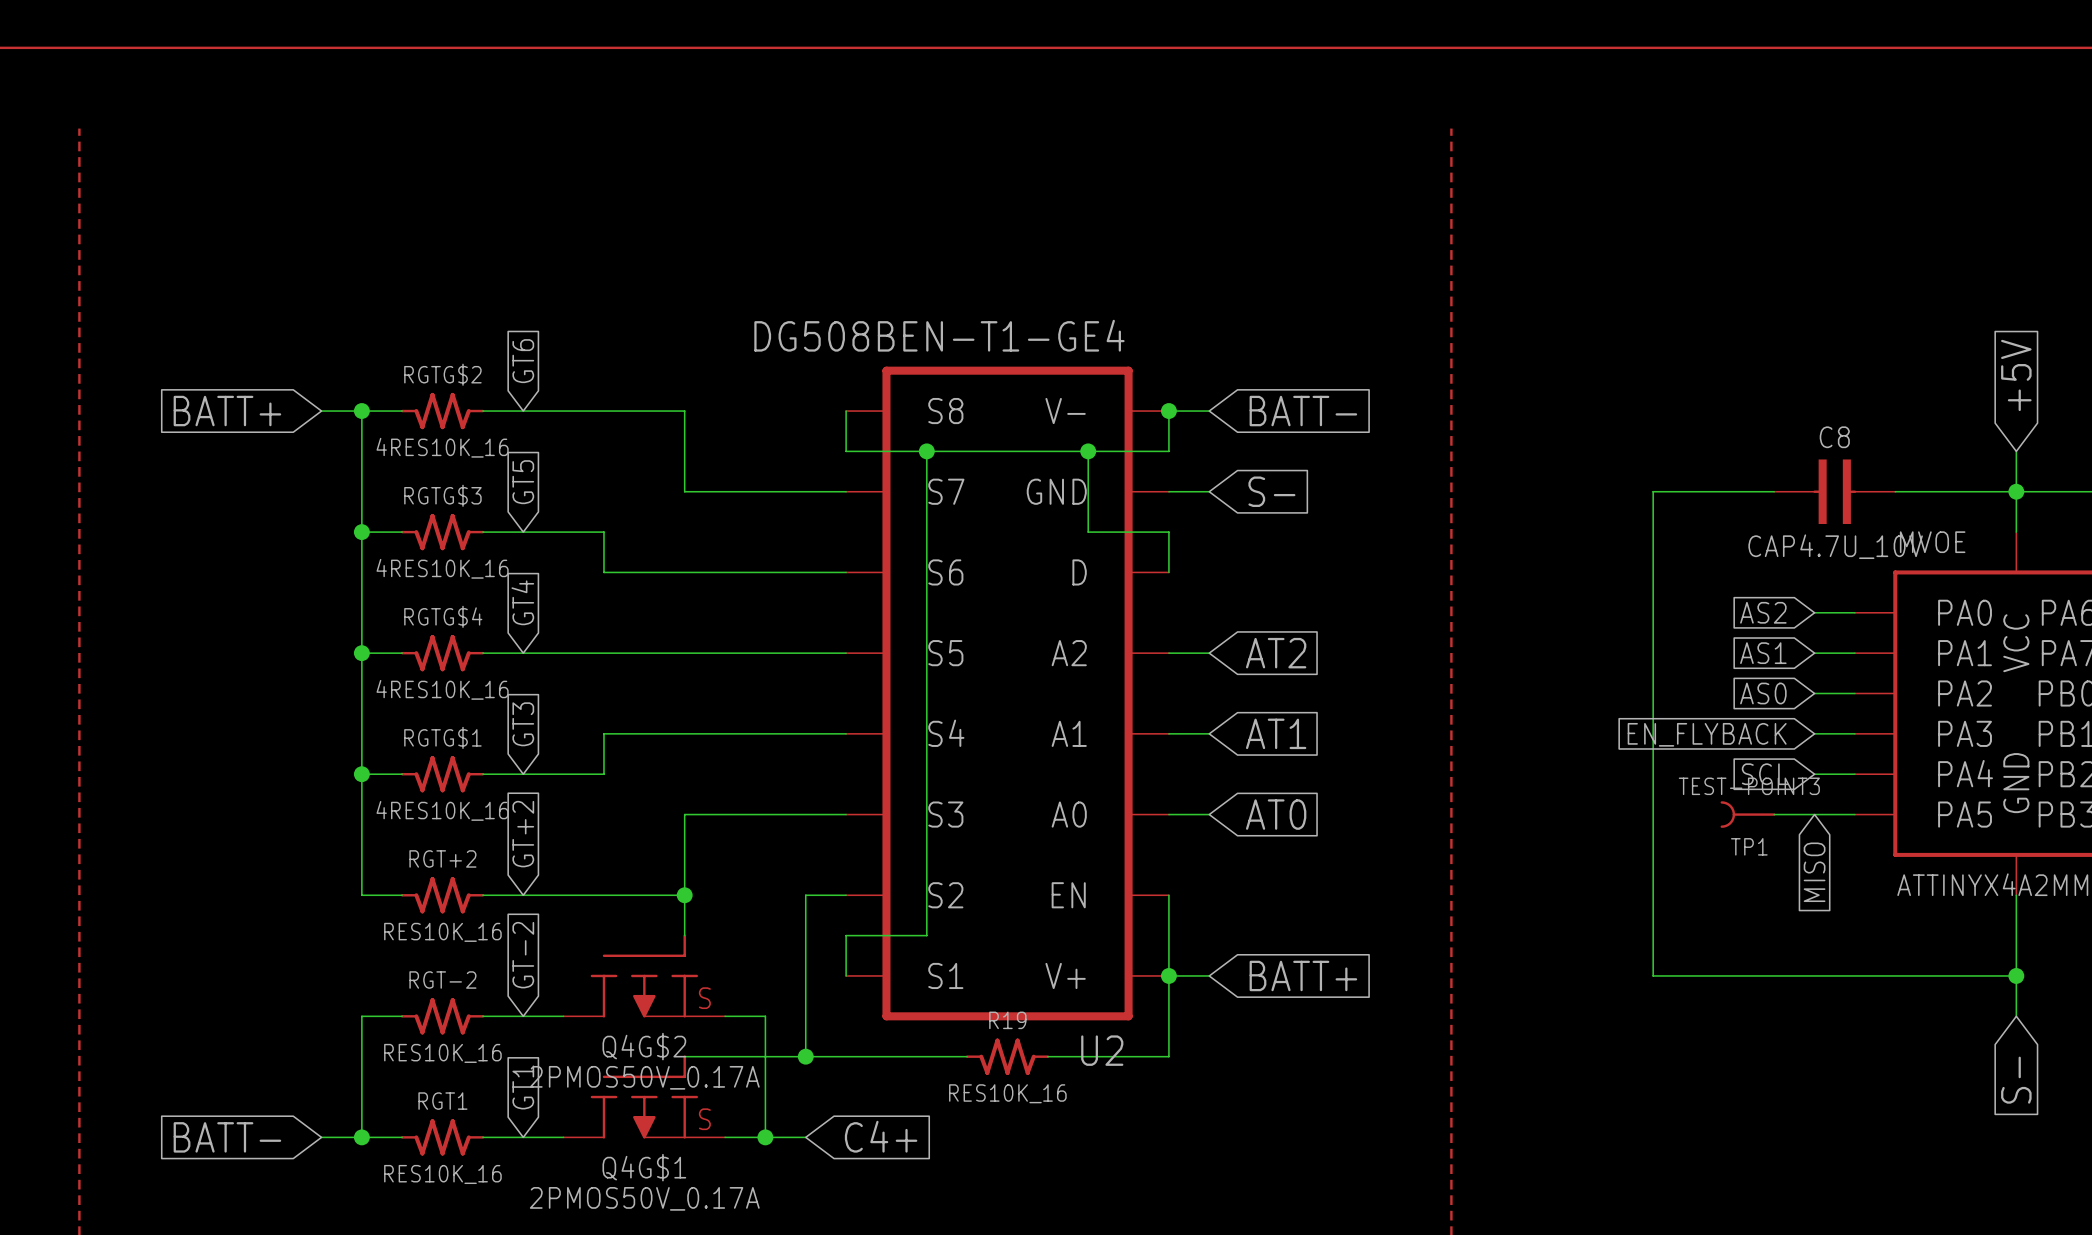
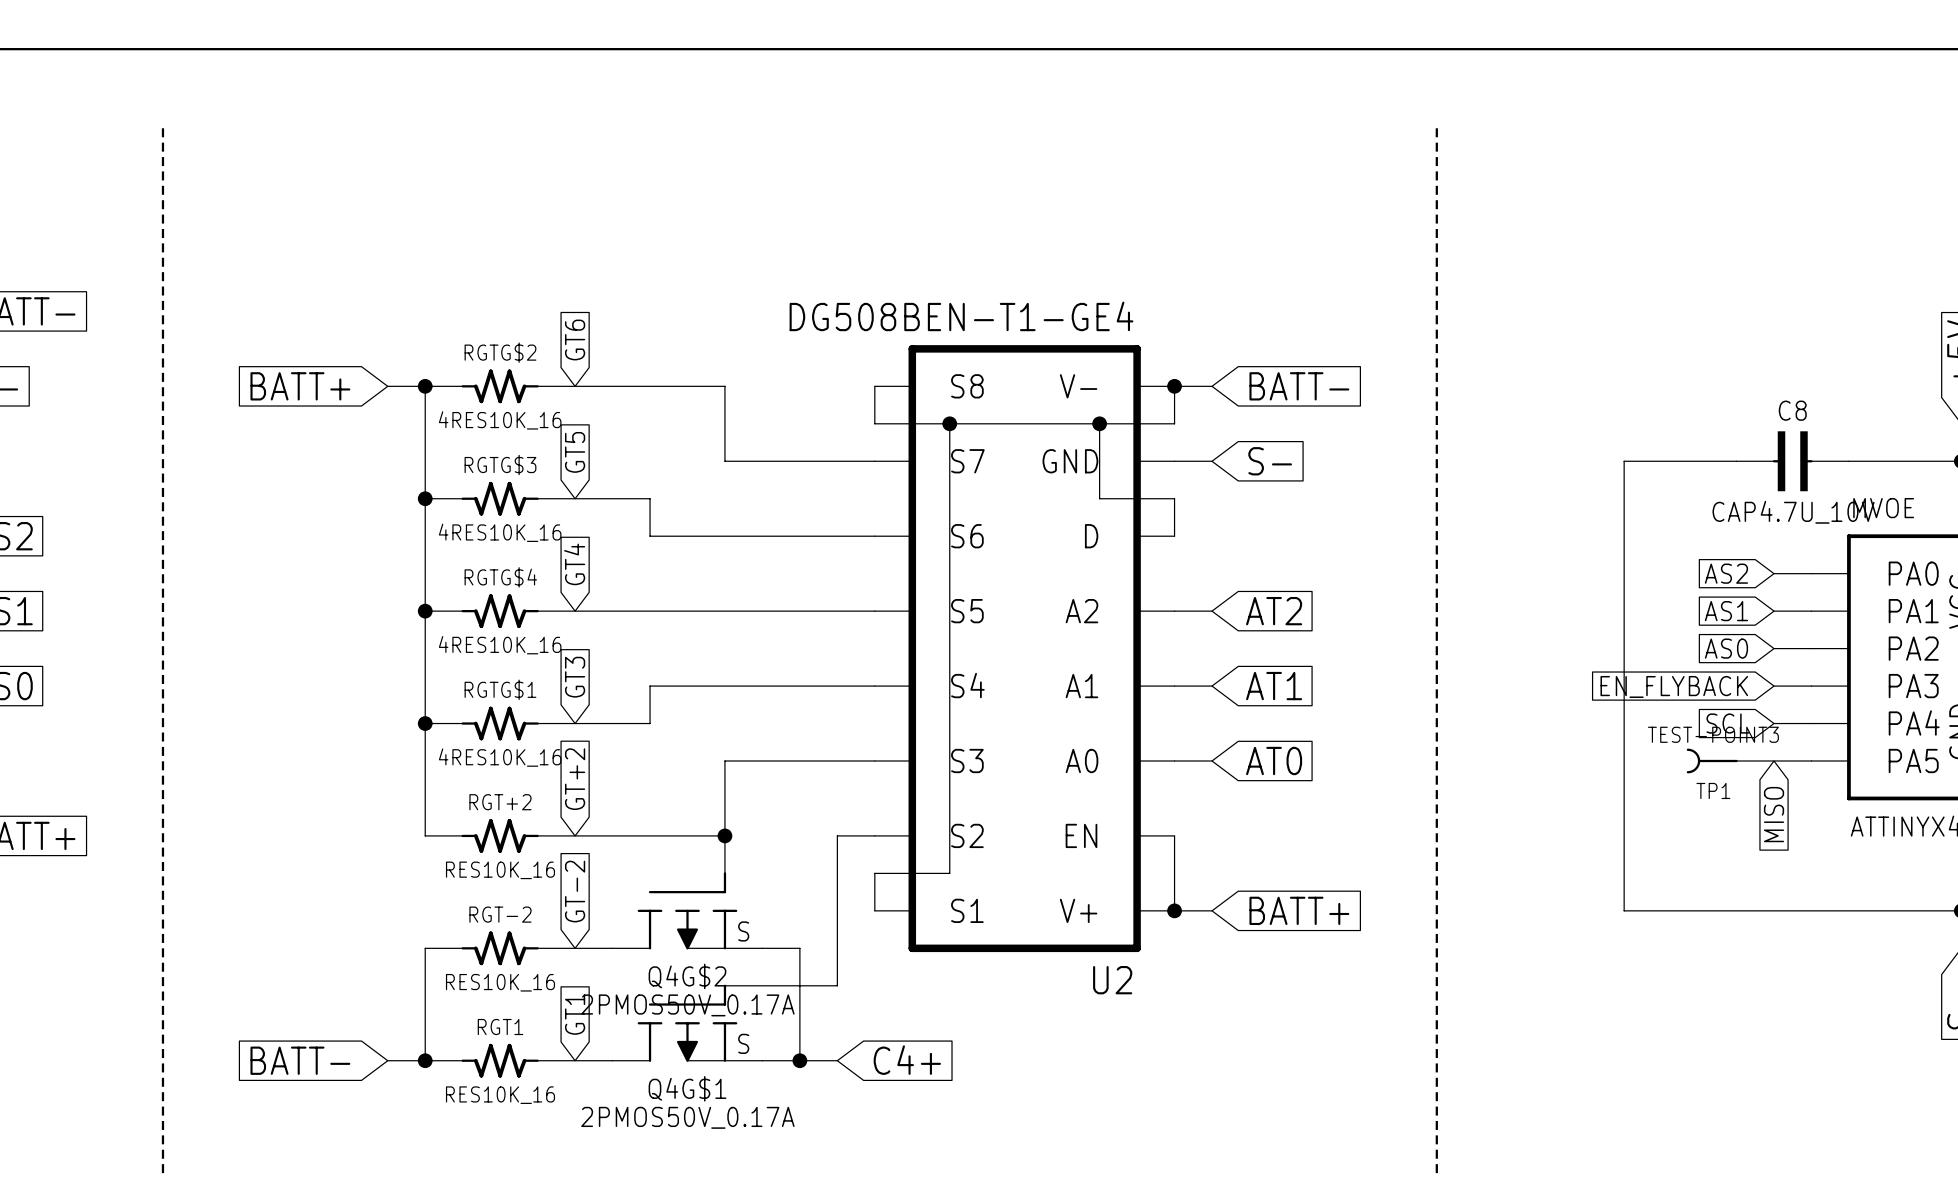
wire: (1168, 975) (1168, 1056) (1047, 1056) -> none
wire: (805, 1056) (967, 1056) -> none
junction: (805, 1056) -> none
R19: RES10K_16 (1007, 1056) -> none

